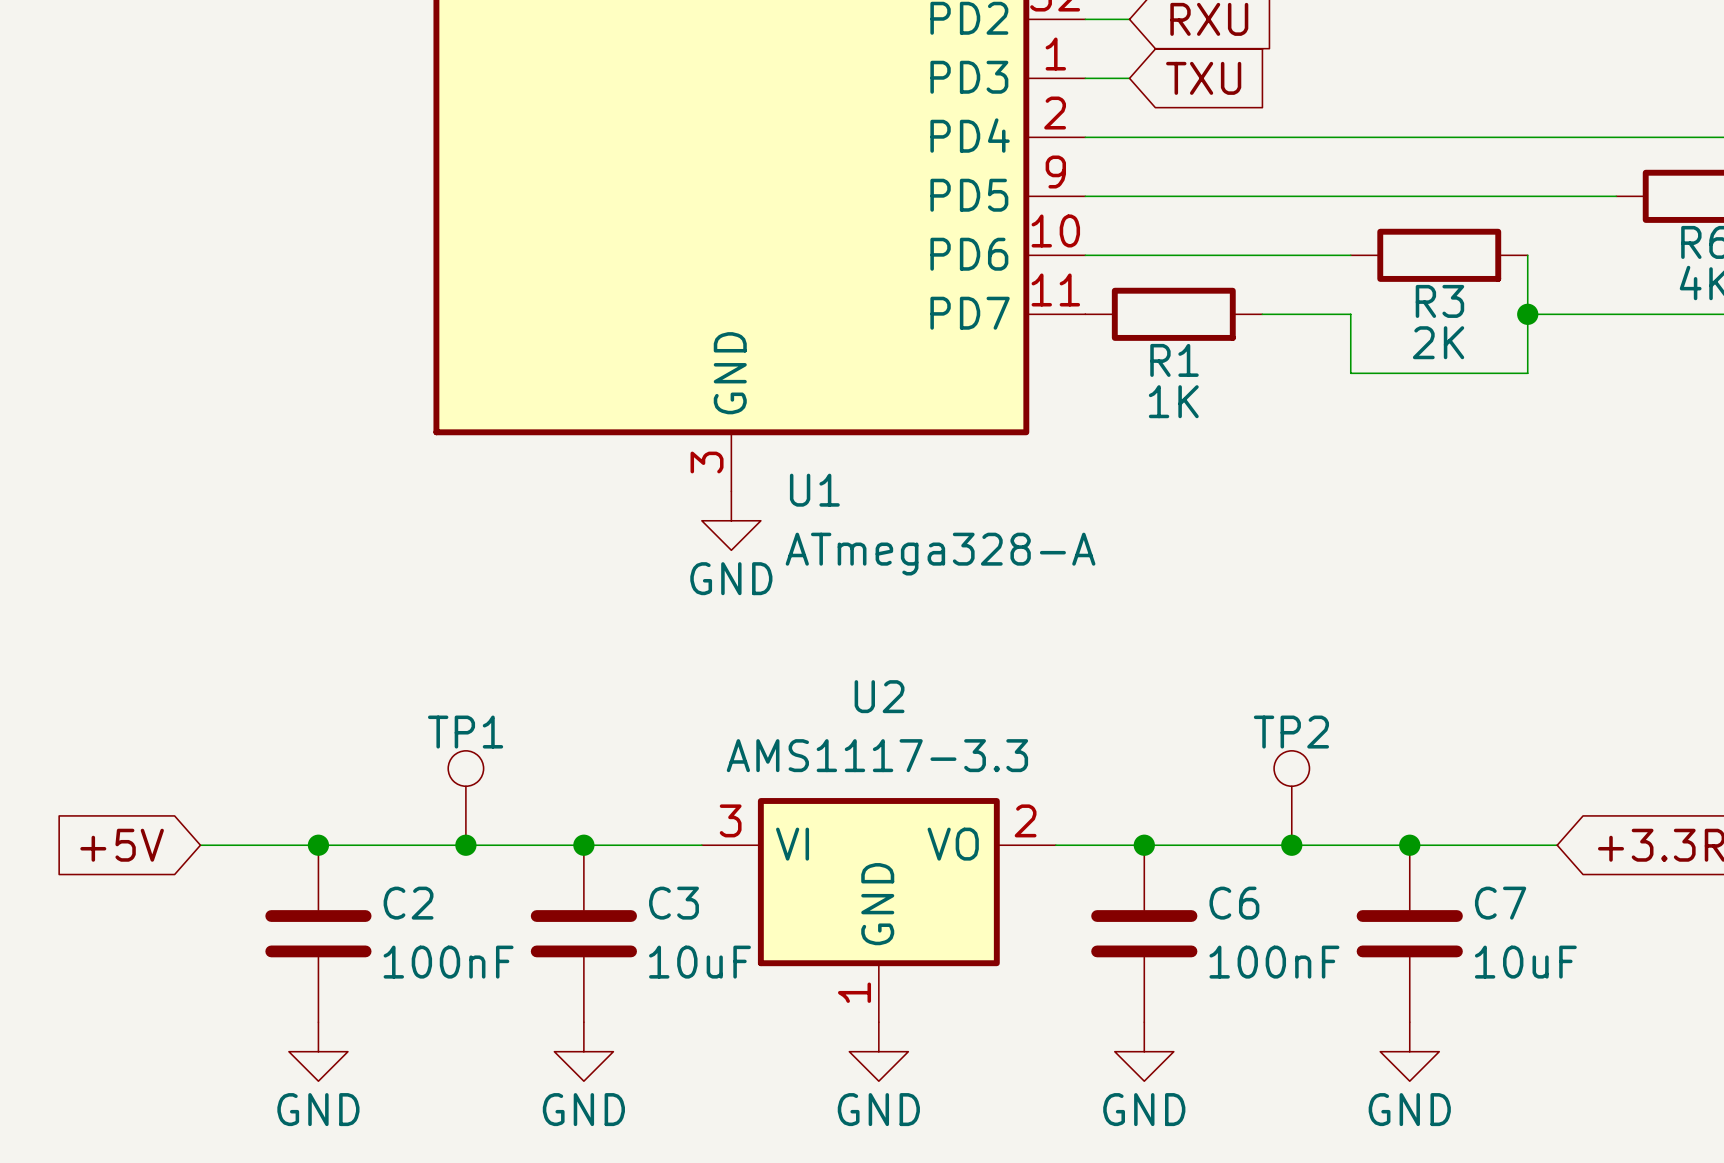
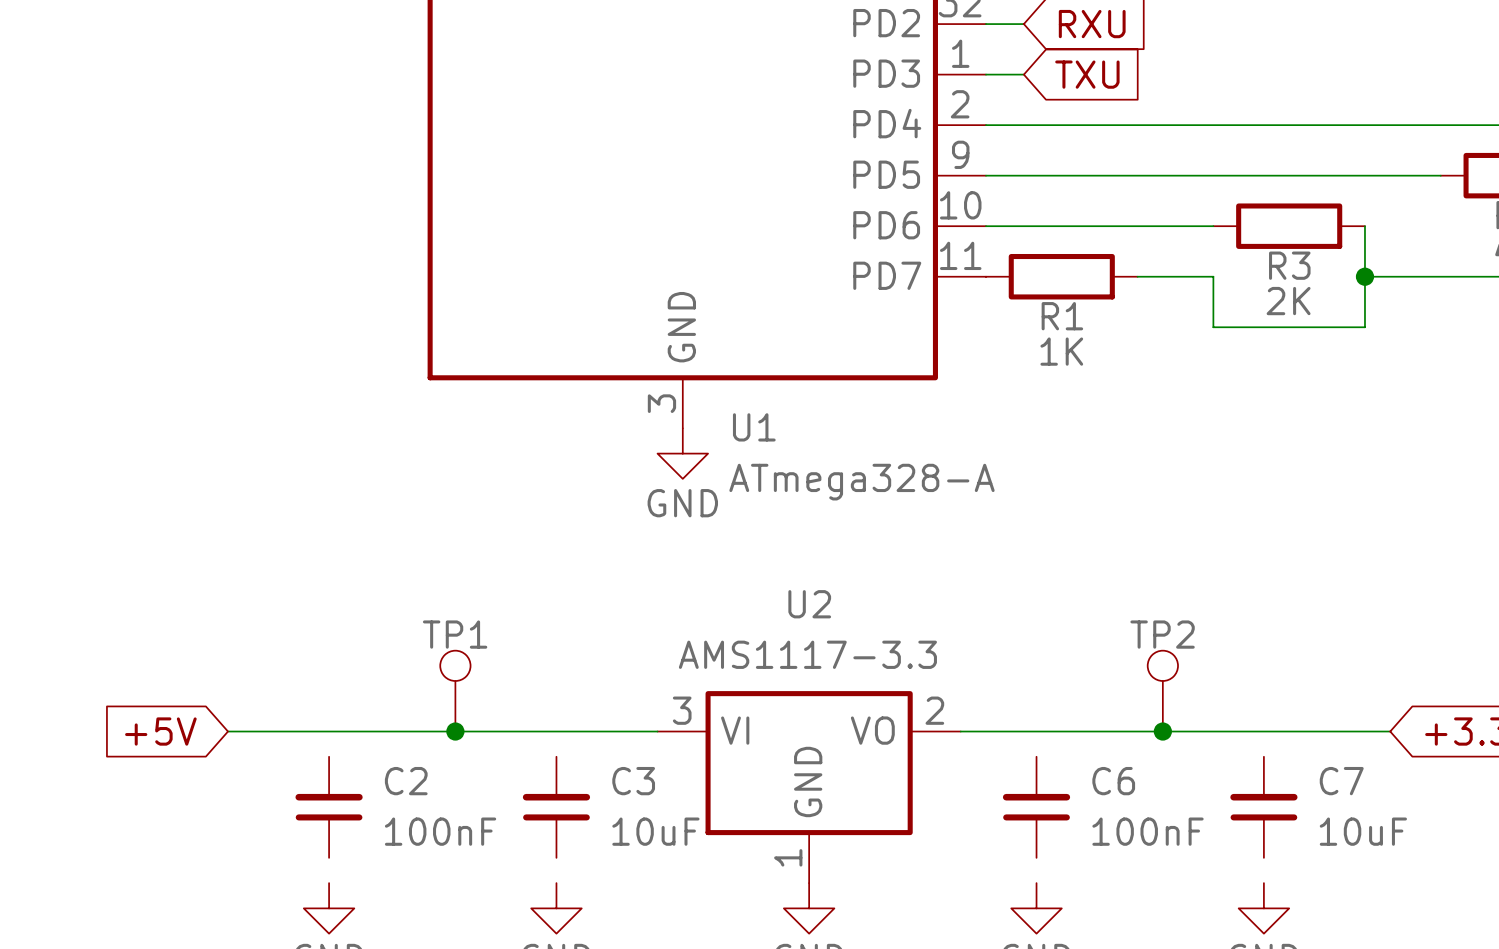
C2 symbol: [265, 845, 372, 1023] -> [295, 756, 363, 858]
junction: (318, 845) -> none
C3 symbol: [530, 845, 637, 1023] -> [522, 756, 591, 858]
junction: (583, 845) -> none
C6 symbol: [1091, 845, 1198, 1023] -> [1002, 756, 1071, 858]
junction: (1144, 845) -> none
C7 symbol: [1356, 845, 1463, 1023] -> [1230, 756, 1298, 858]
junction: (1409, 845) -> none

